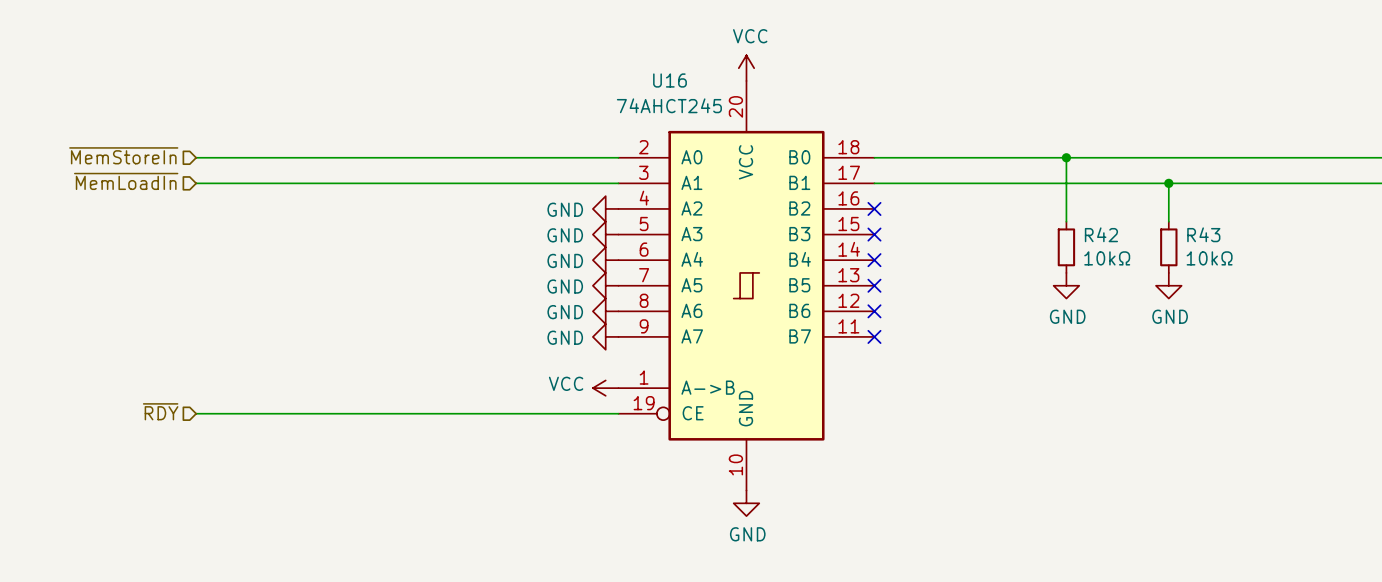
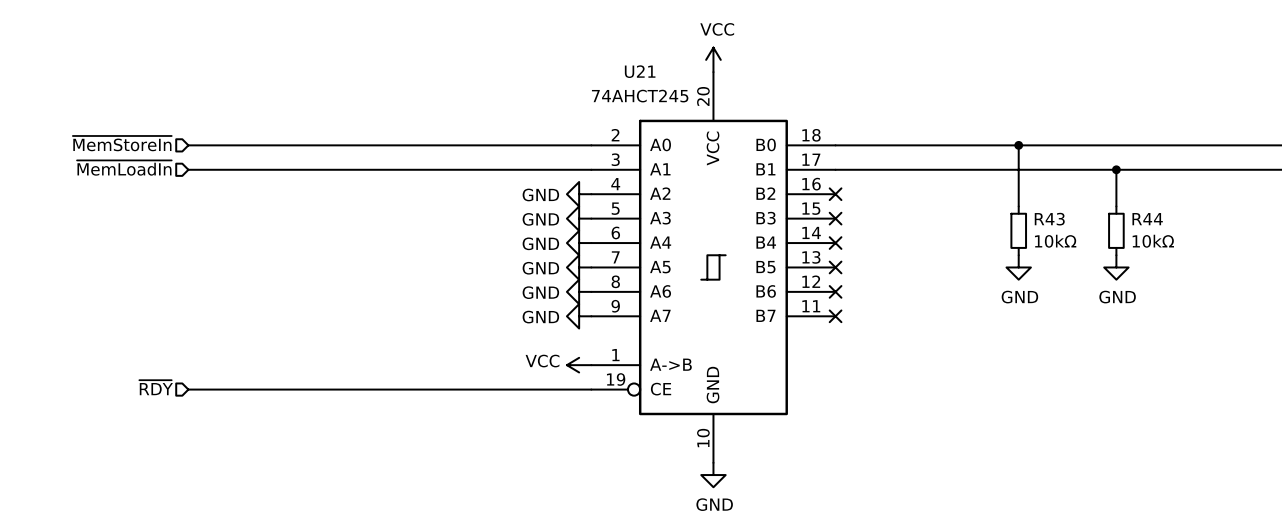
U16 name: U16 (670, 80) -> U21 (640, 71)
R42 name: R42 (1101, 234) -> R43 (1049, 219)
R43 name: R43 (1203, 234) -> R44 (1147, 219)

